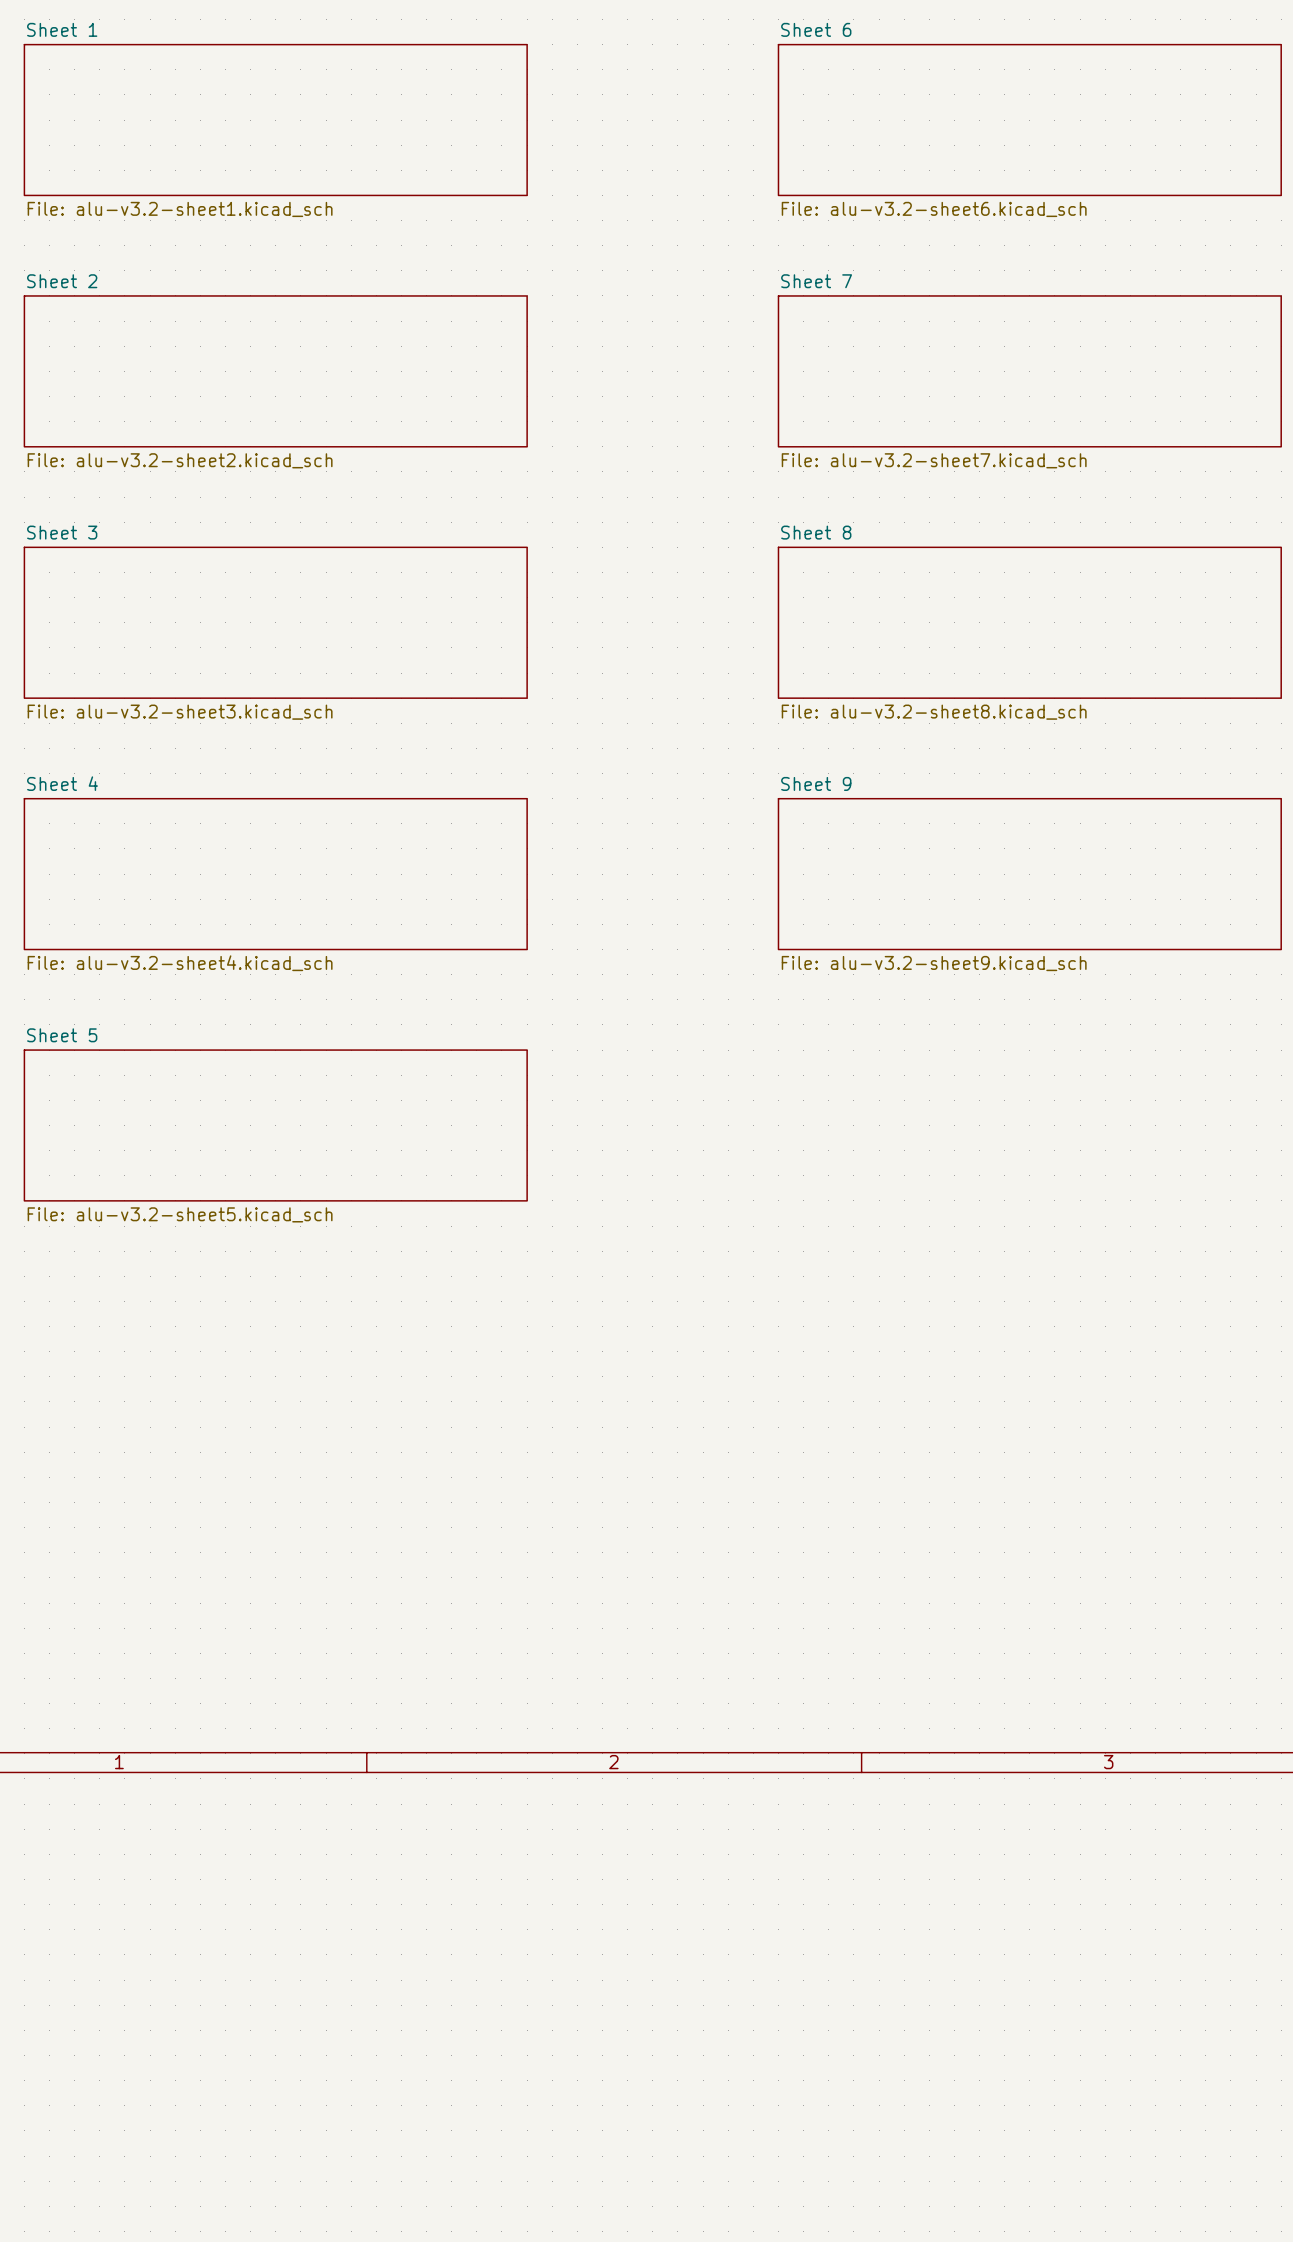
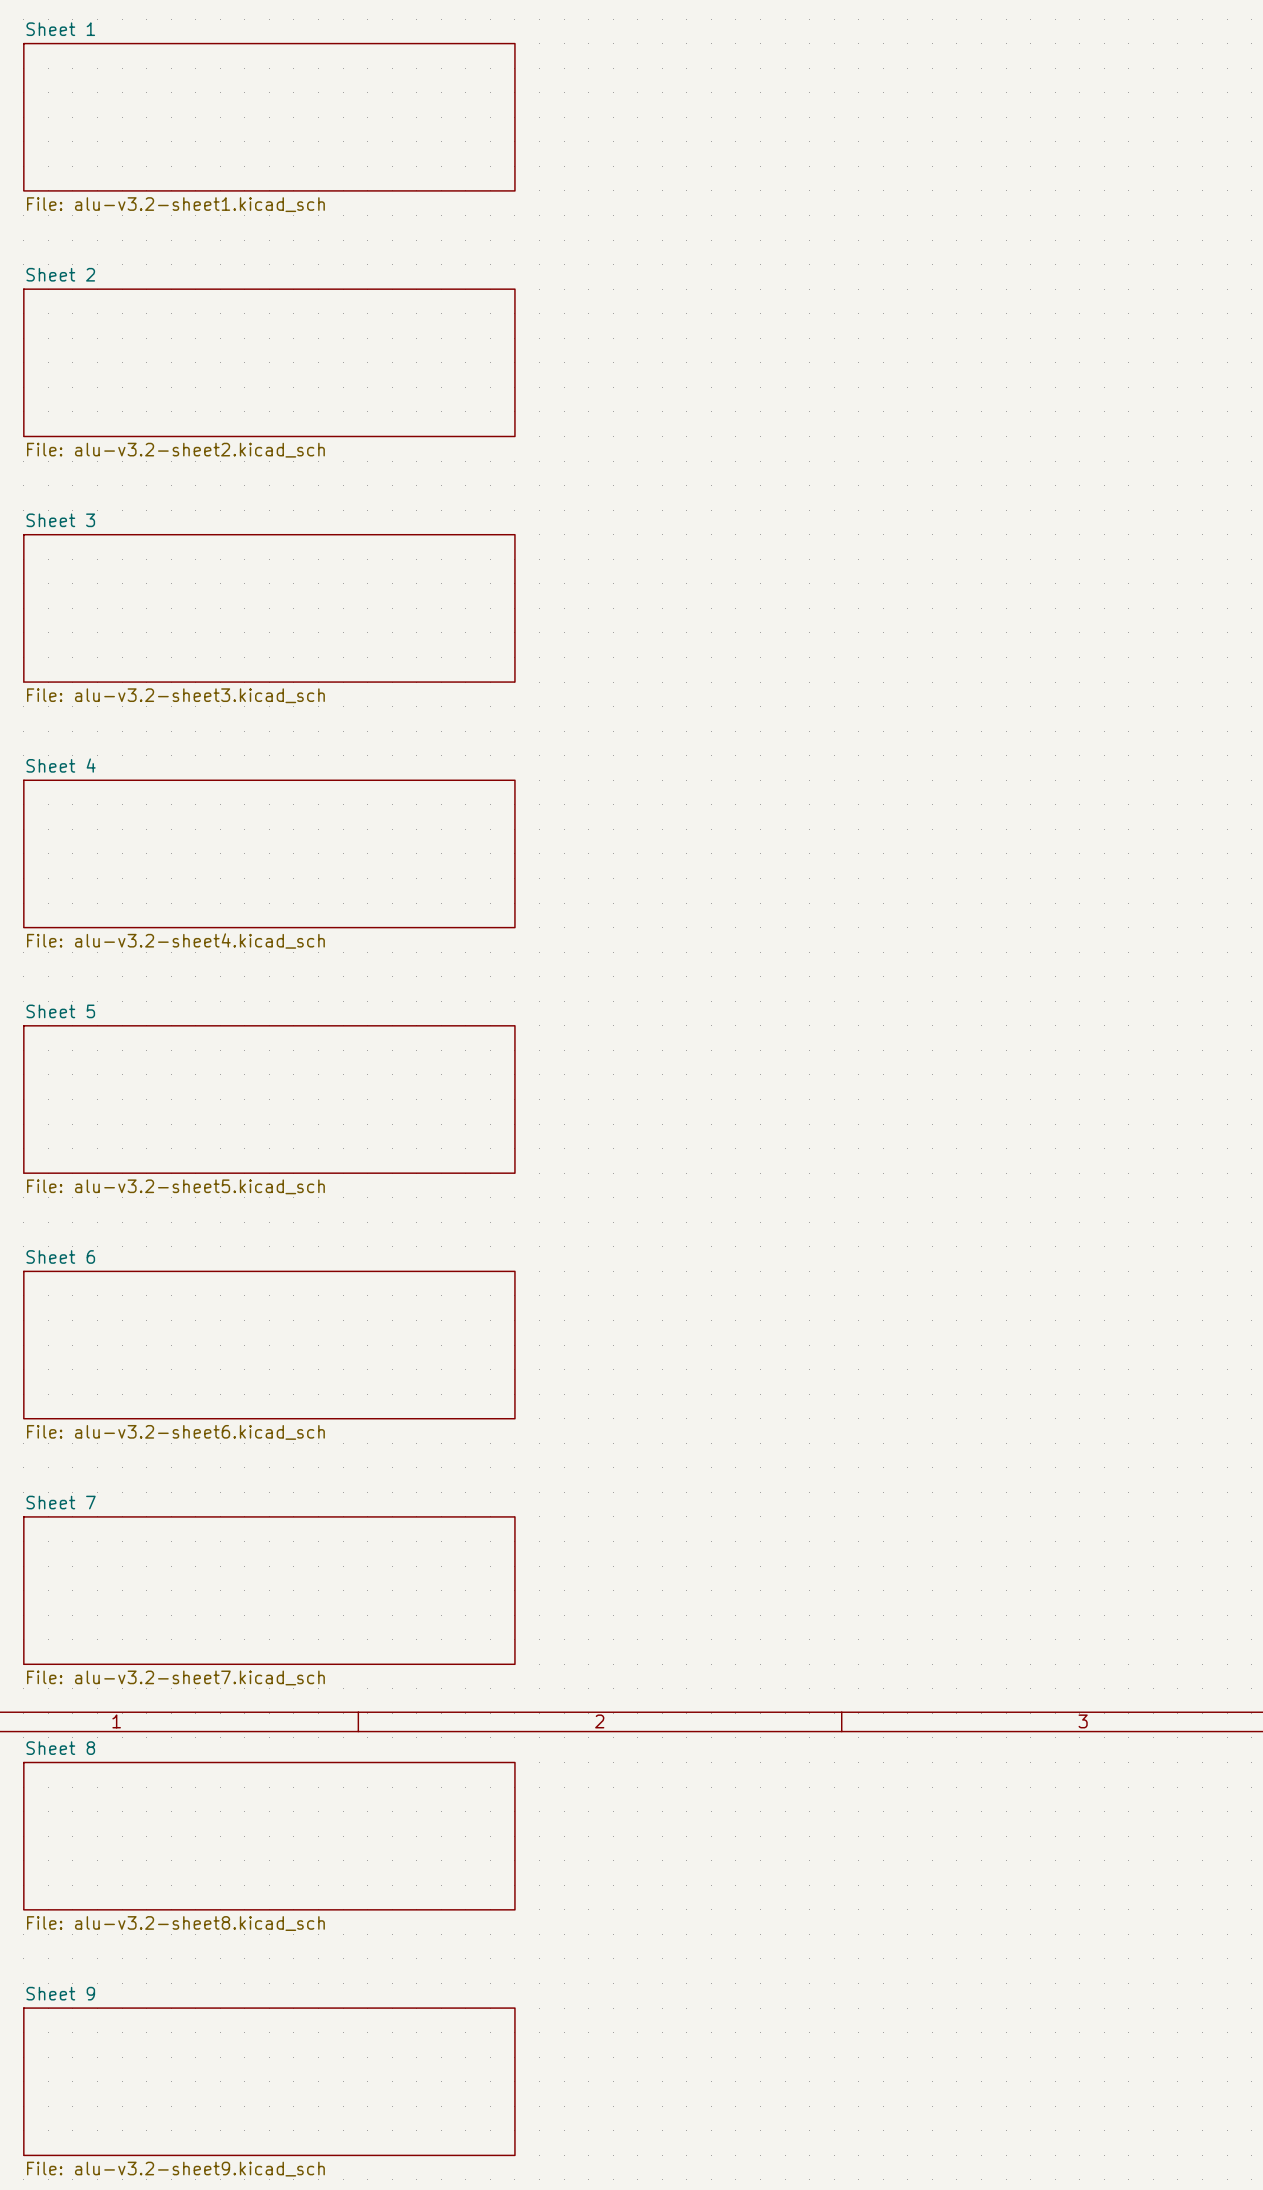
sheet Sheet 6 position: (1029, 120) -> (269, 1345)
sheet Sheet 7 position: (1029, 371) -> (269, 1590)
sheet Sheet 8 position: (1029, 622) -> (269, 1836)
sheet Sheet 9 position: (1029, 874) -> (269, 2081)

